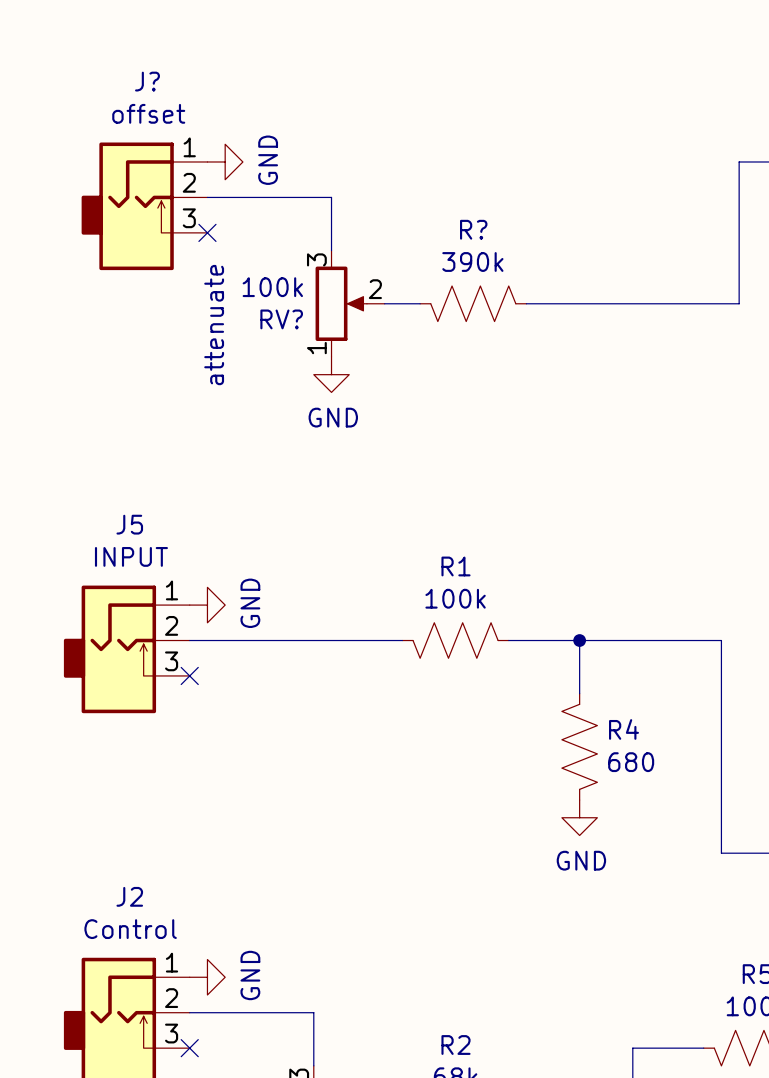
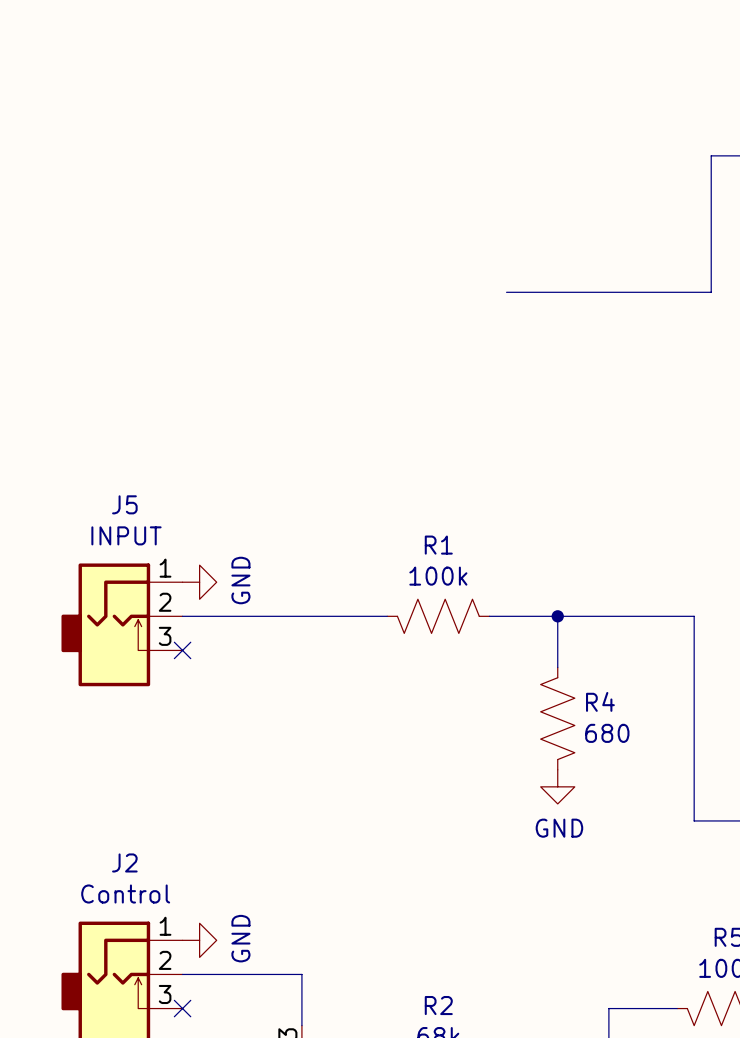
power symbol: GND (225, 161) -> none
wire: (207, 197) (331, 197) (331, 250) -> none
J?: offset (144, 206) -> none
no-connect mark: (207, 232) -> none
RV?: 100k (350, 303) -> none
wire: (384, 303) (420, 303) -> none
R?: 390k (473, 303) -> none
text: attenuate (214, 325) -> none
power symbol: GND (331, 374) -> none

